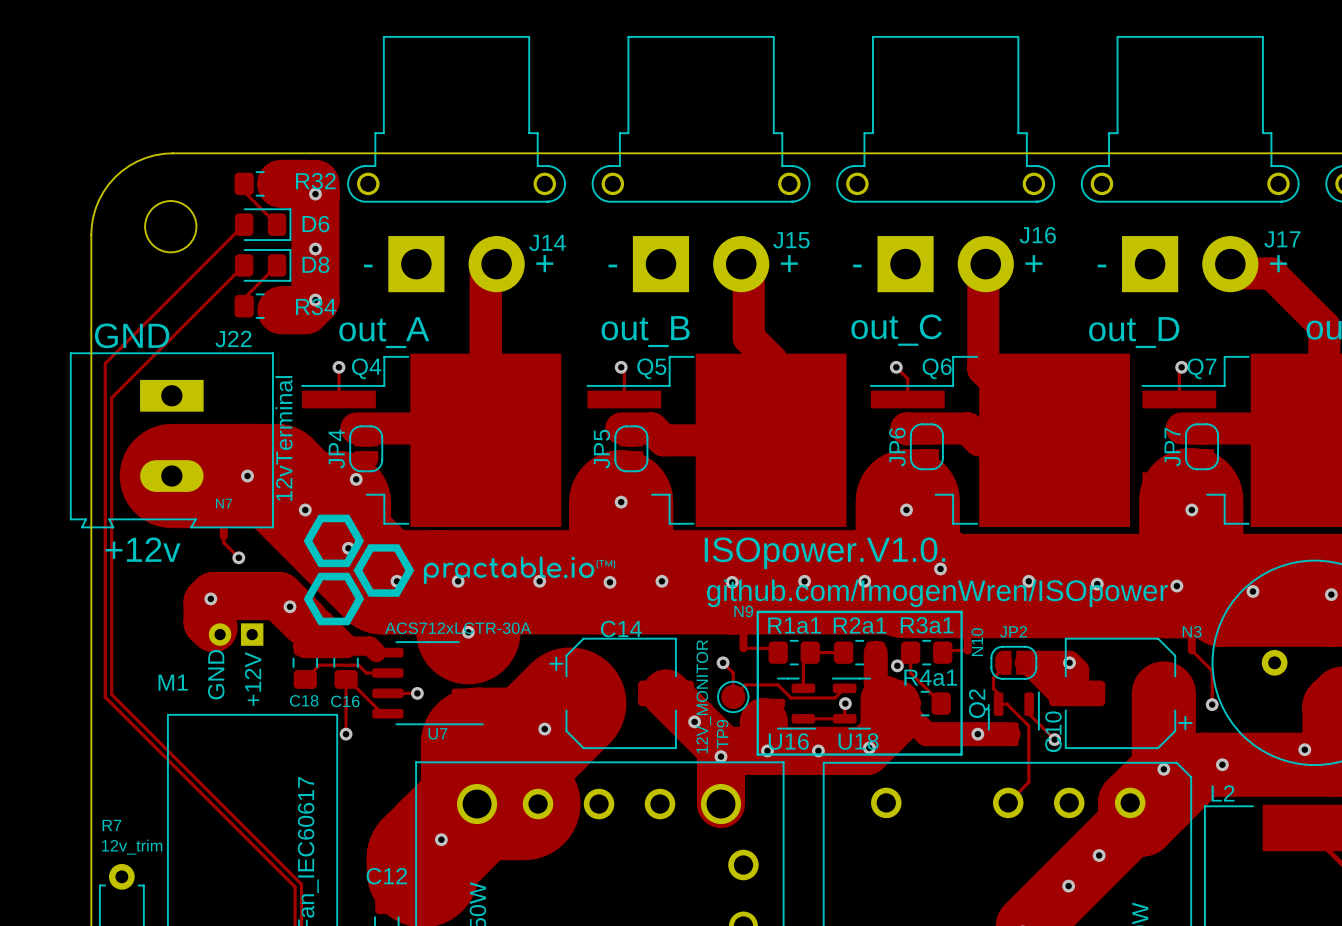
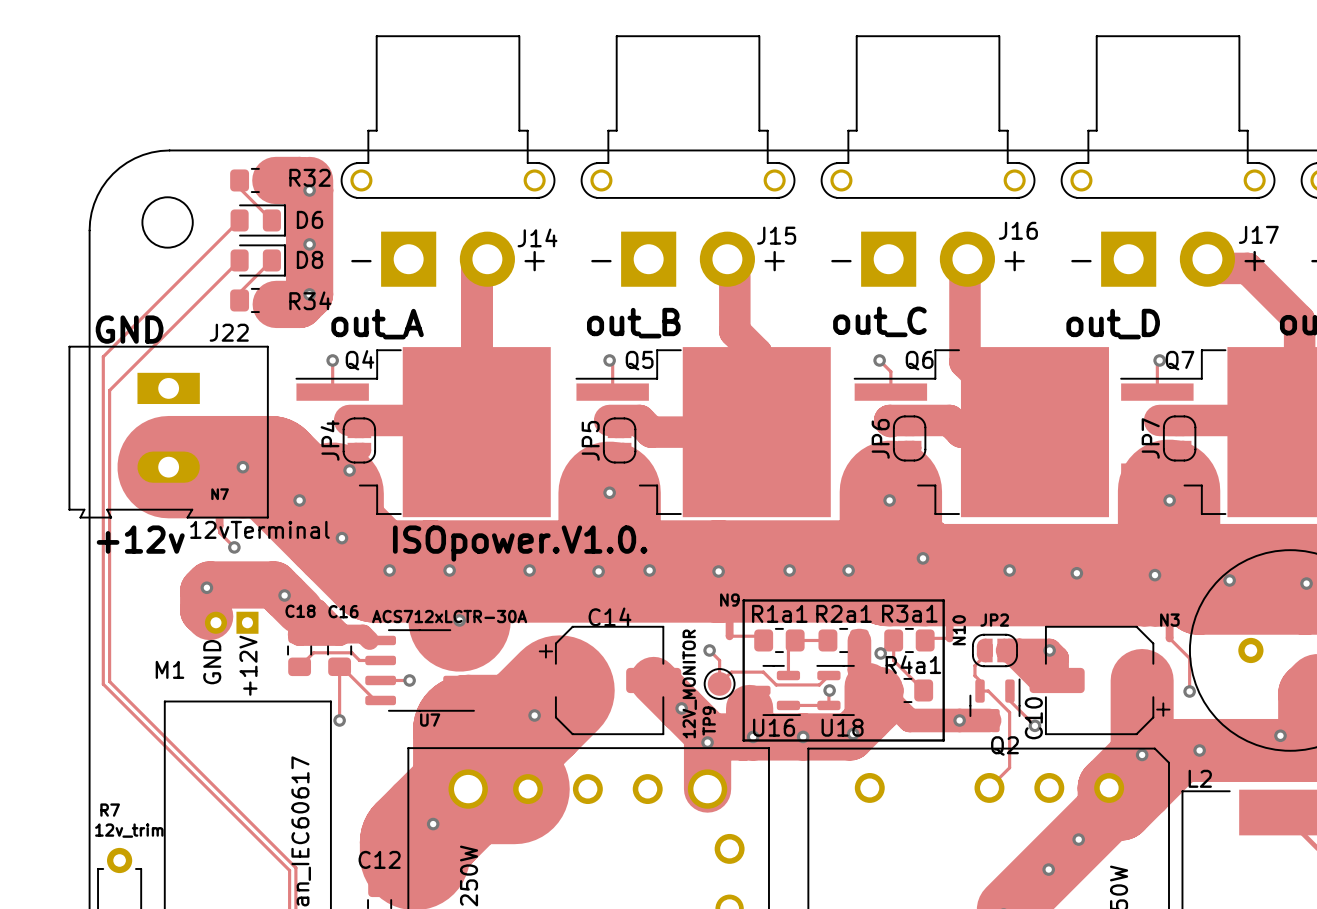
J22 value rotation: 0° (284, 438) -> 90° clockwise (259, 529)
drawing: [303, 514, 616, 626] -> none
text position: ISOpower.V1.0. (825, 553) -> ISOpower.V1.0. (520, 543)
text: github.com/ImogenWren/ISOpower (937, 593) -> none
C18 name position: C18 (304, 700) -> C18 (300, 611)
C16 name position: C16 (345, 701) -> C16 (343, 611)
Q2 name rotation: 0° (979, 703) -> 90° clockwise (1004, 745)
Q2 name position: Q2 (979, 703) -> Q2 (1004, 745)

